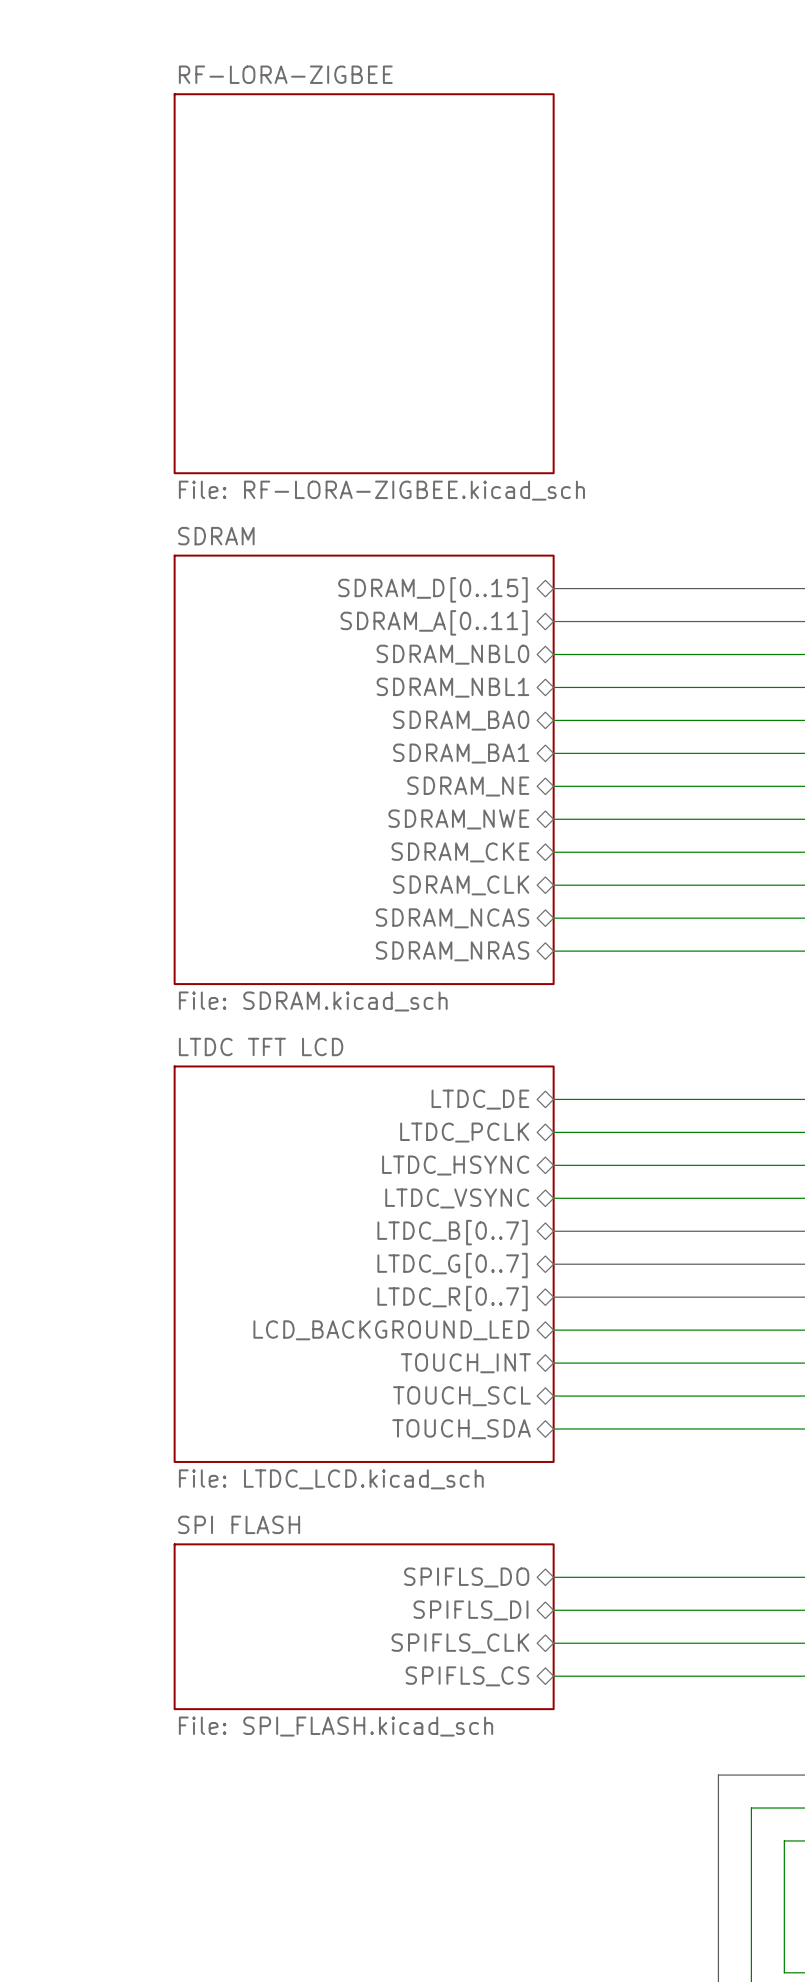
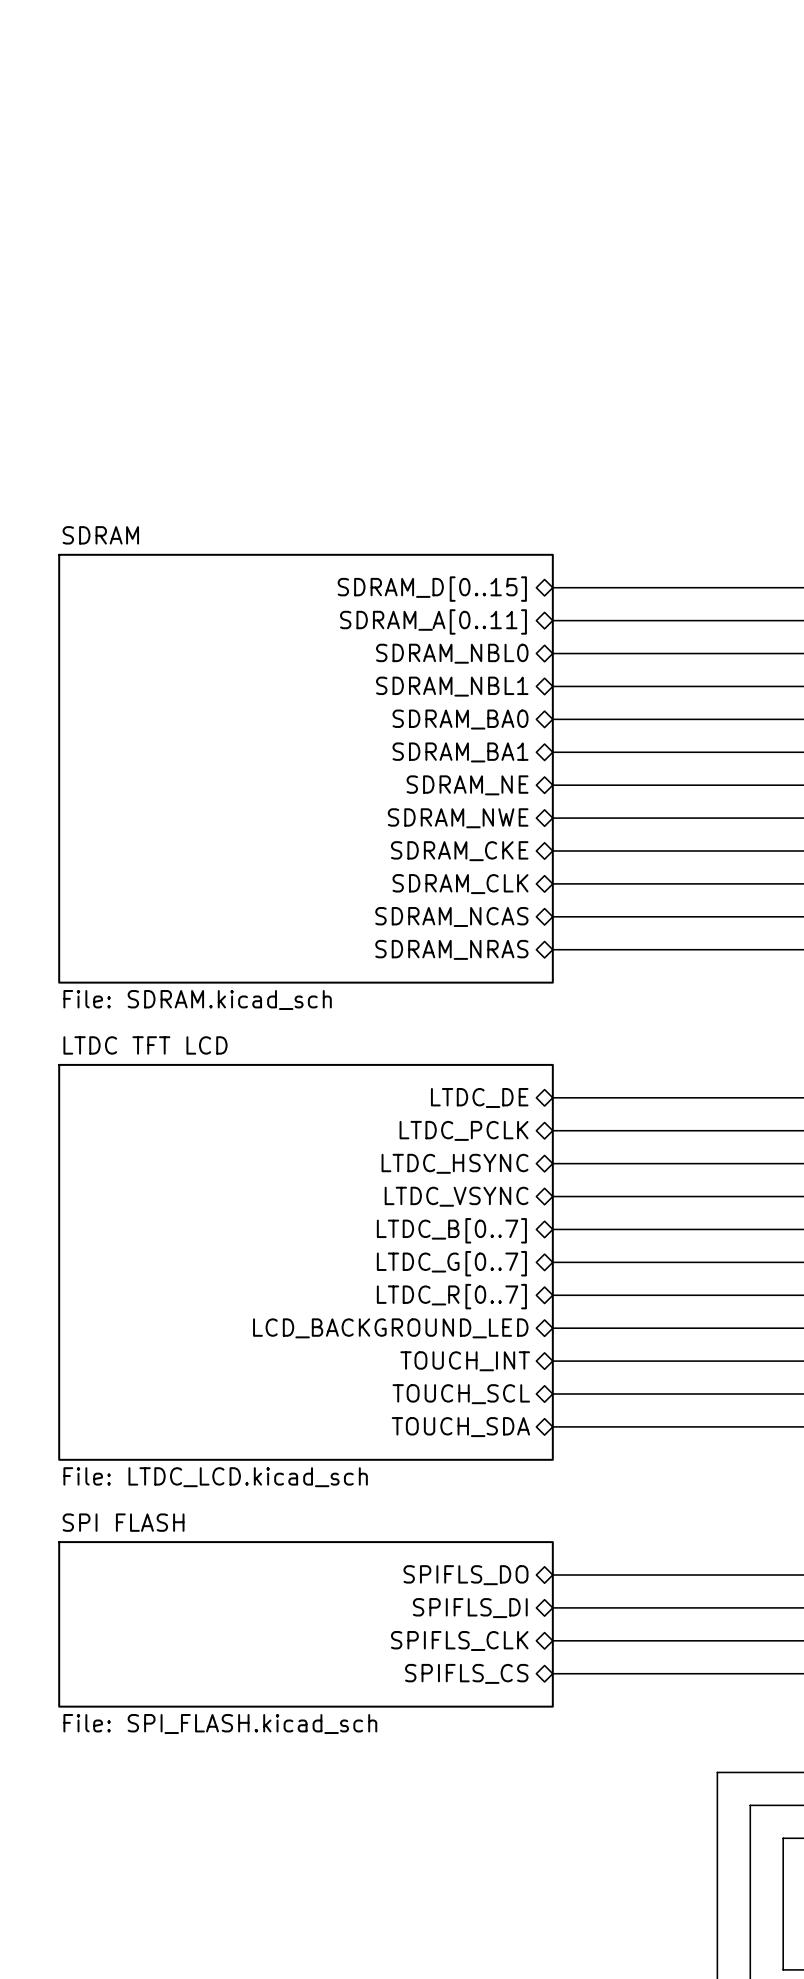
sheet RF-LORA-ZIGBEE: File: RF-LORA-ZIGBEE.kicad_sch (364, 283) -> none
sheet SDRAM: none -> File: SDRAM.kicad_sch (306, 768)
sheet SDRAM: File: SDRAM.kicad_sch (364, 769) -> none
sheet LTDC TFT LCD: none -> File: LTDC_LCD.kicad_sch (306, 1262)
sheet LTDC TFT LCD: File: LTDC_LCD.kicad_sch (364, 1264) -> none
sheet SPI FLASH: none -> File: SPI_FLASH.kicad_sch (306, 1624)
sheet SPI FLASH: File: SPI_FLASH.kicad_sch (364, 1626) -> none

